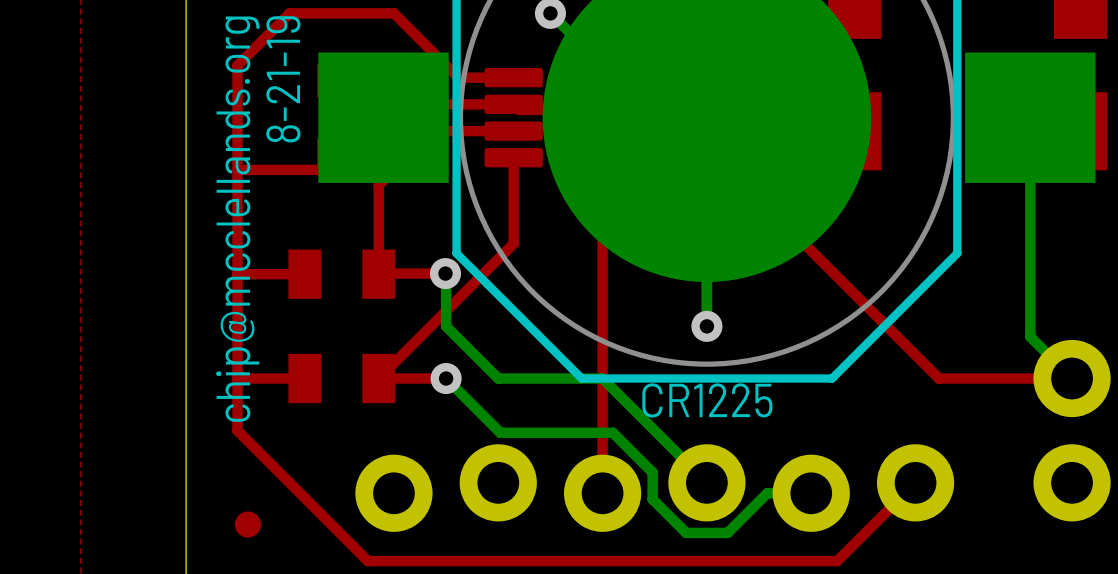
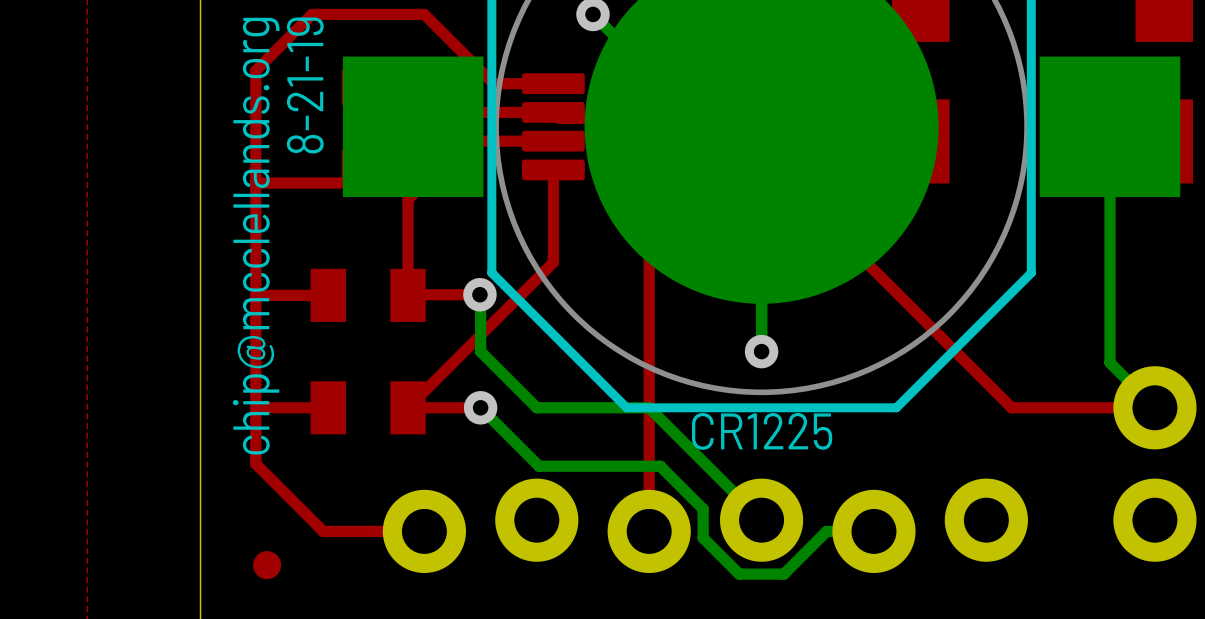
top track: (915, 482) (837, 561) (367, 561) (300, 493) -> (424, 531) (323, 531)

